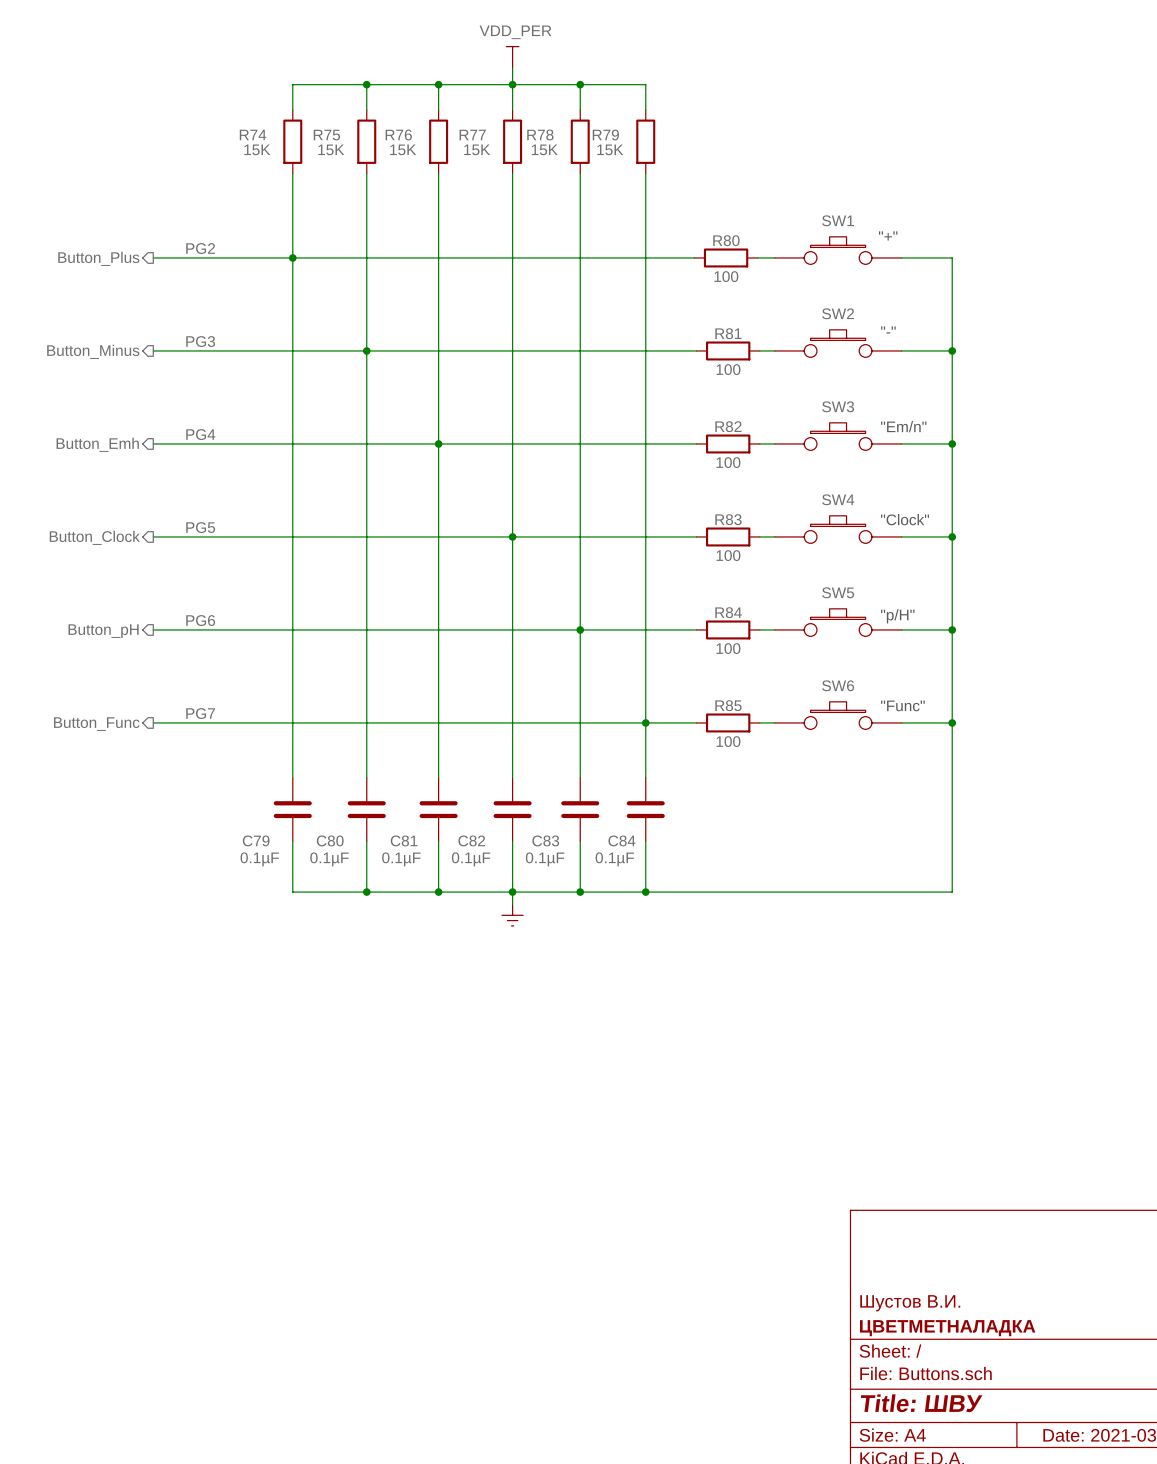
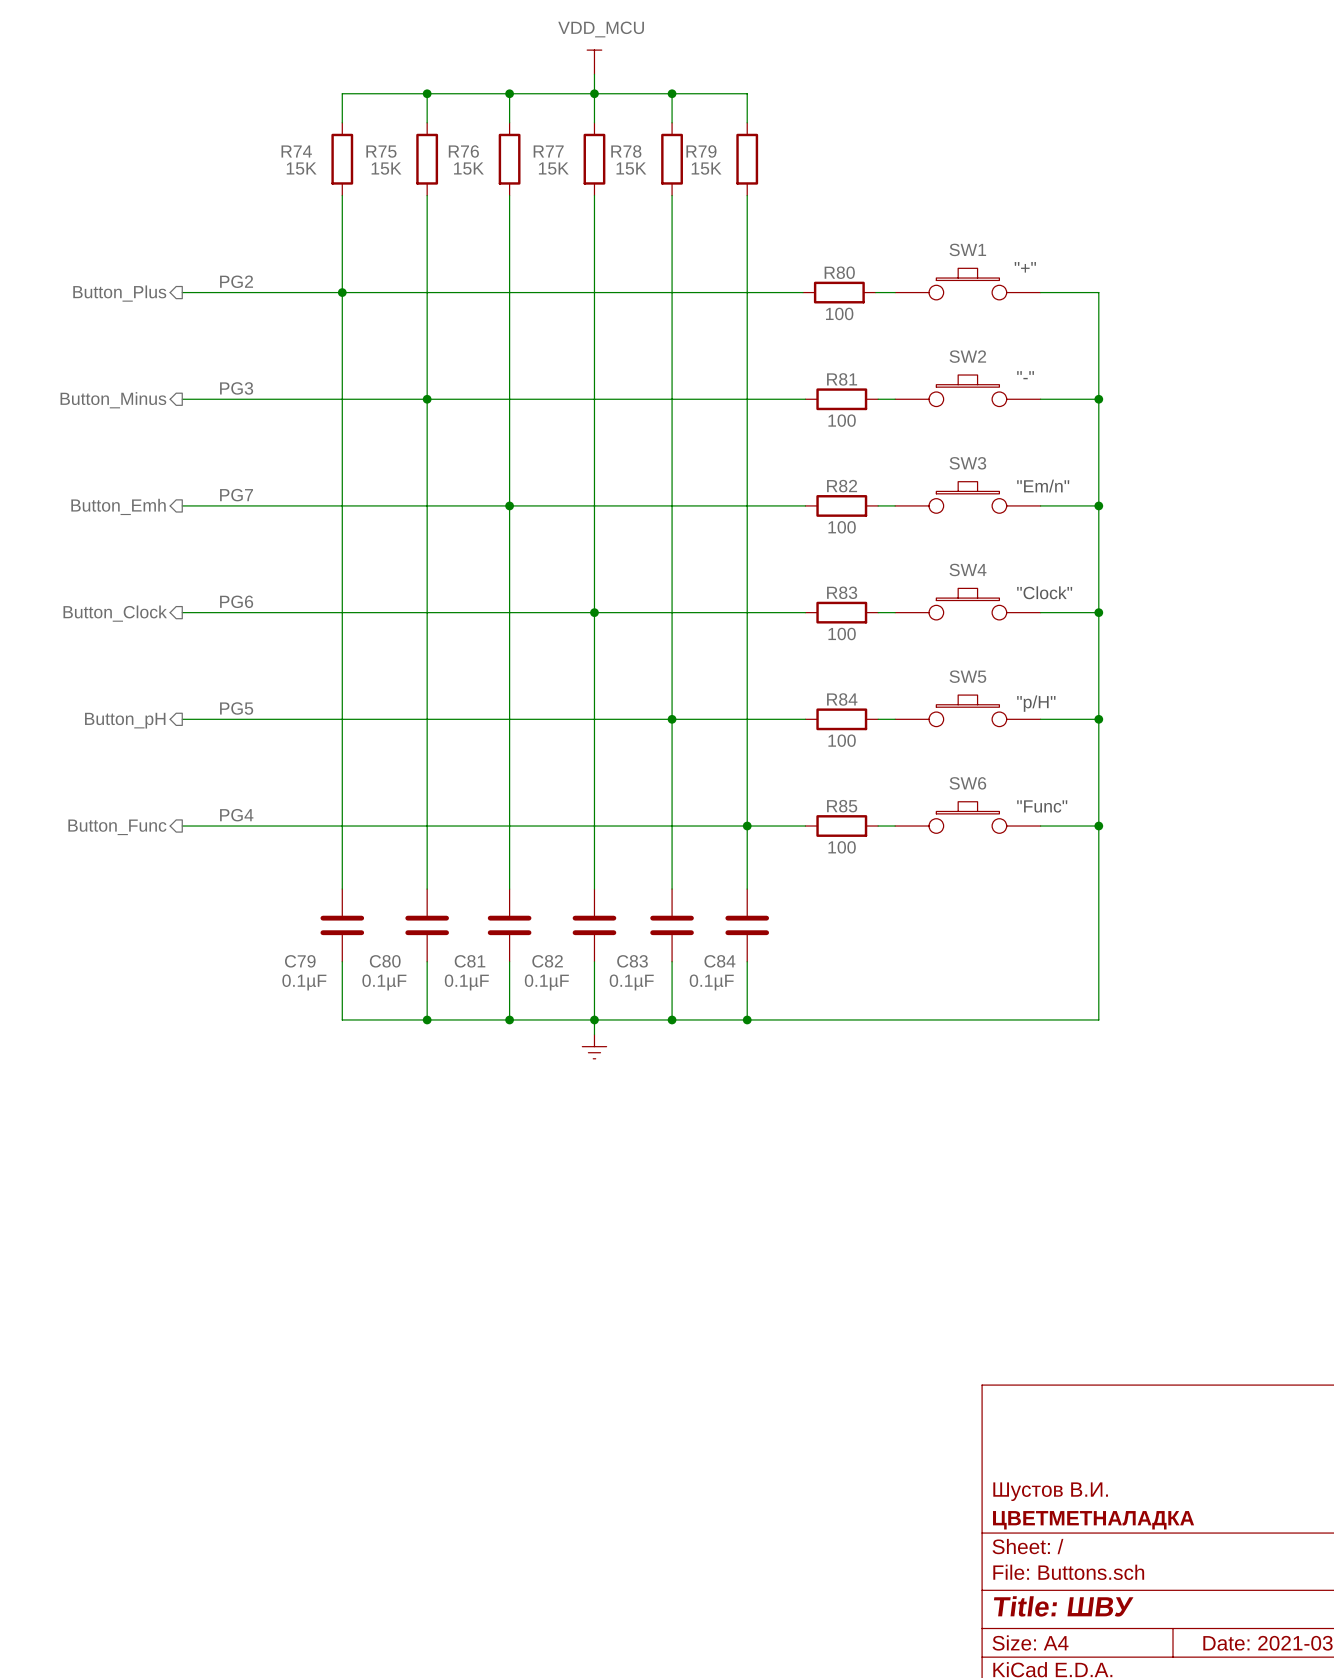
power symbol: VDD_PER (512, 57) -> VDD_MCU (594, 62)
label: PG4 (200, 434) -> PG7 (236, 495)
label: PG5 (200, 527) -> PG6 (236, 601)
label: PG6 (200, 620) -> PG5 (236, 708)
label: PG7 (200, 713) -> PG4 (236, 815)

